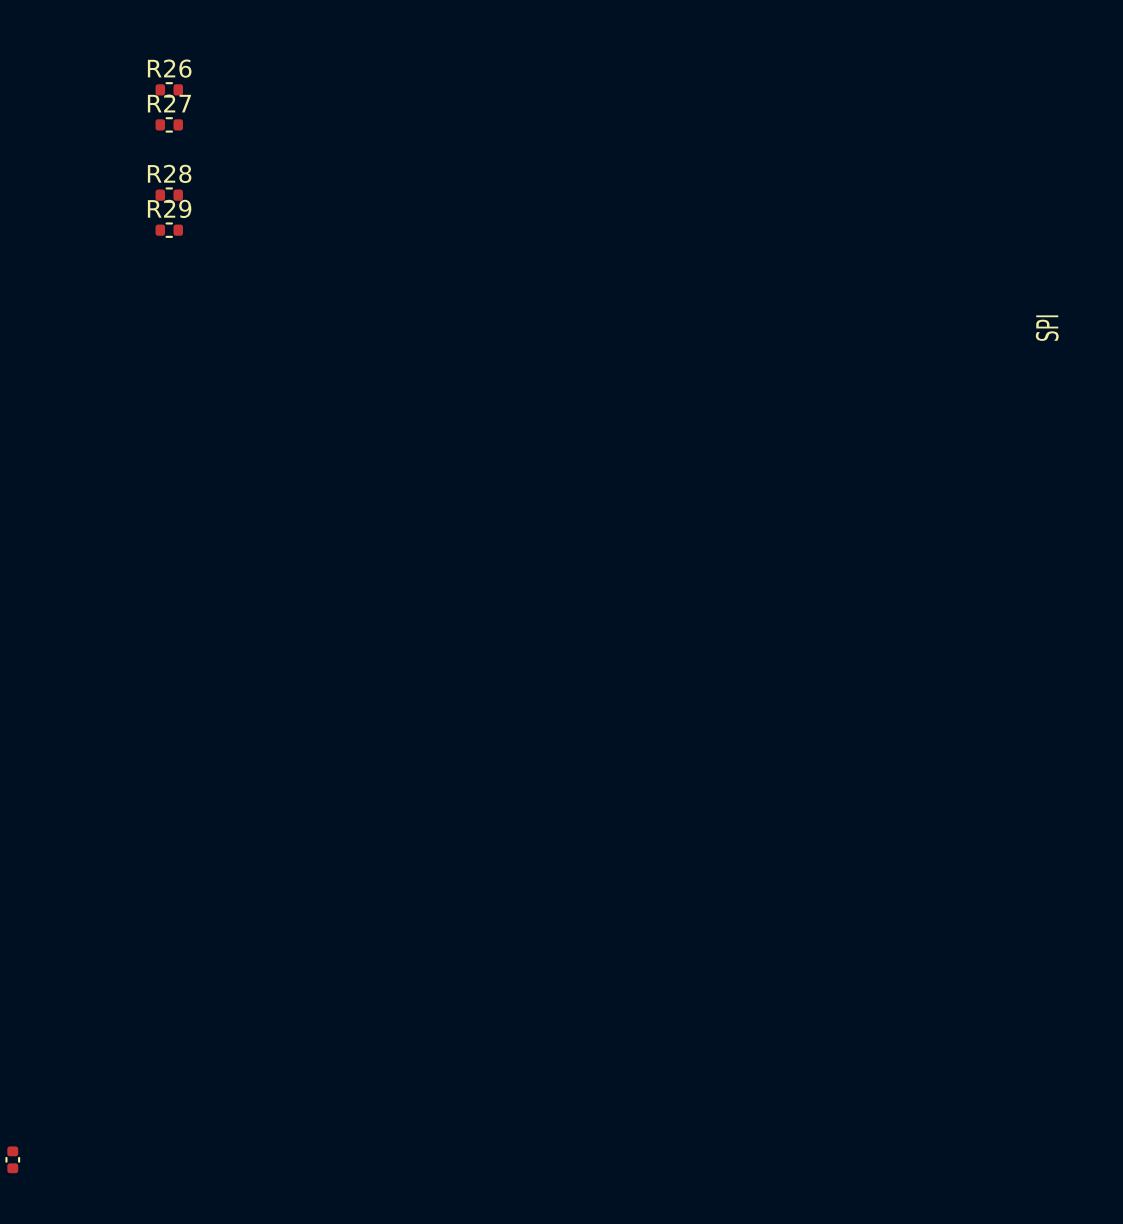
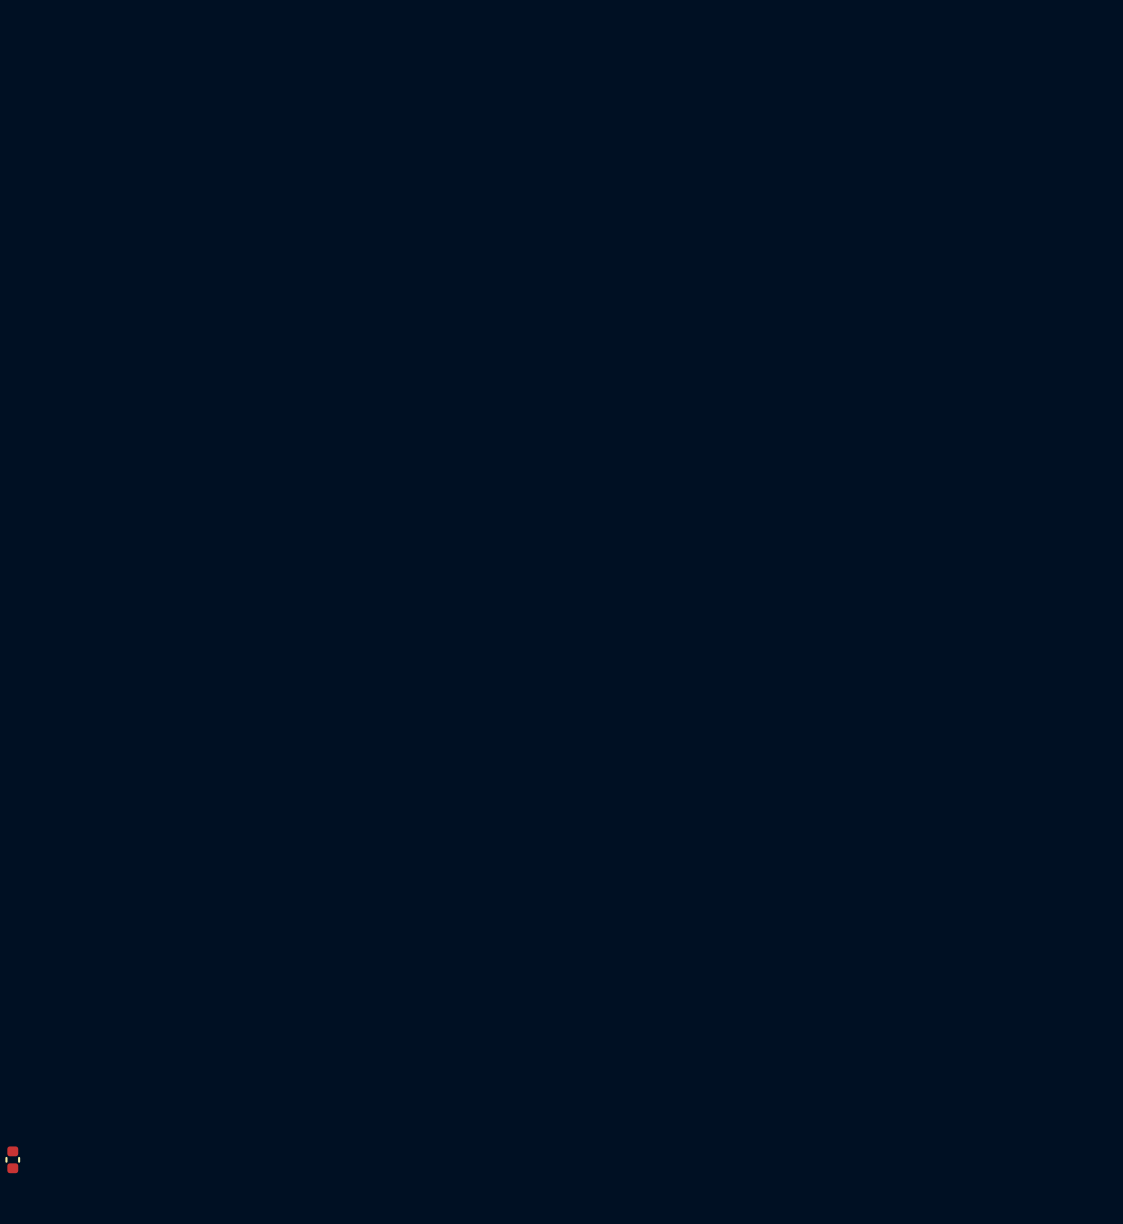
R26: (169, 89) -> none
R27: (169, 124) -> none
R28: (169, 195) -> none
R29: (169, 230) -> none
text: SPI (1047, 328) -> none

